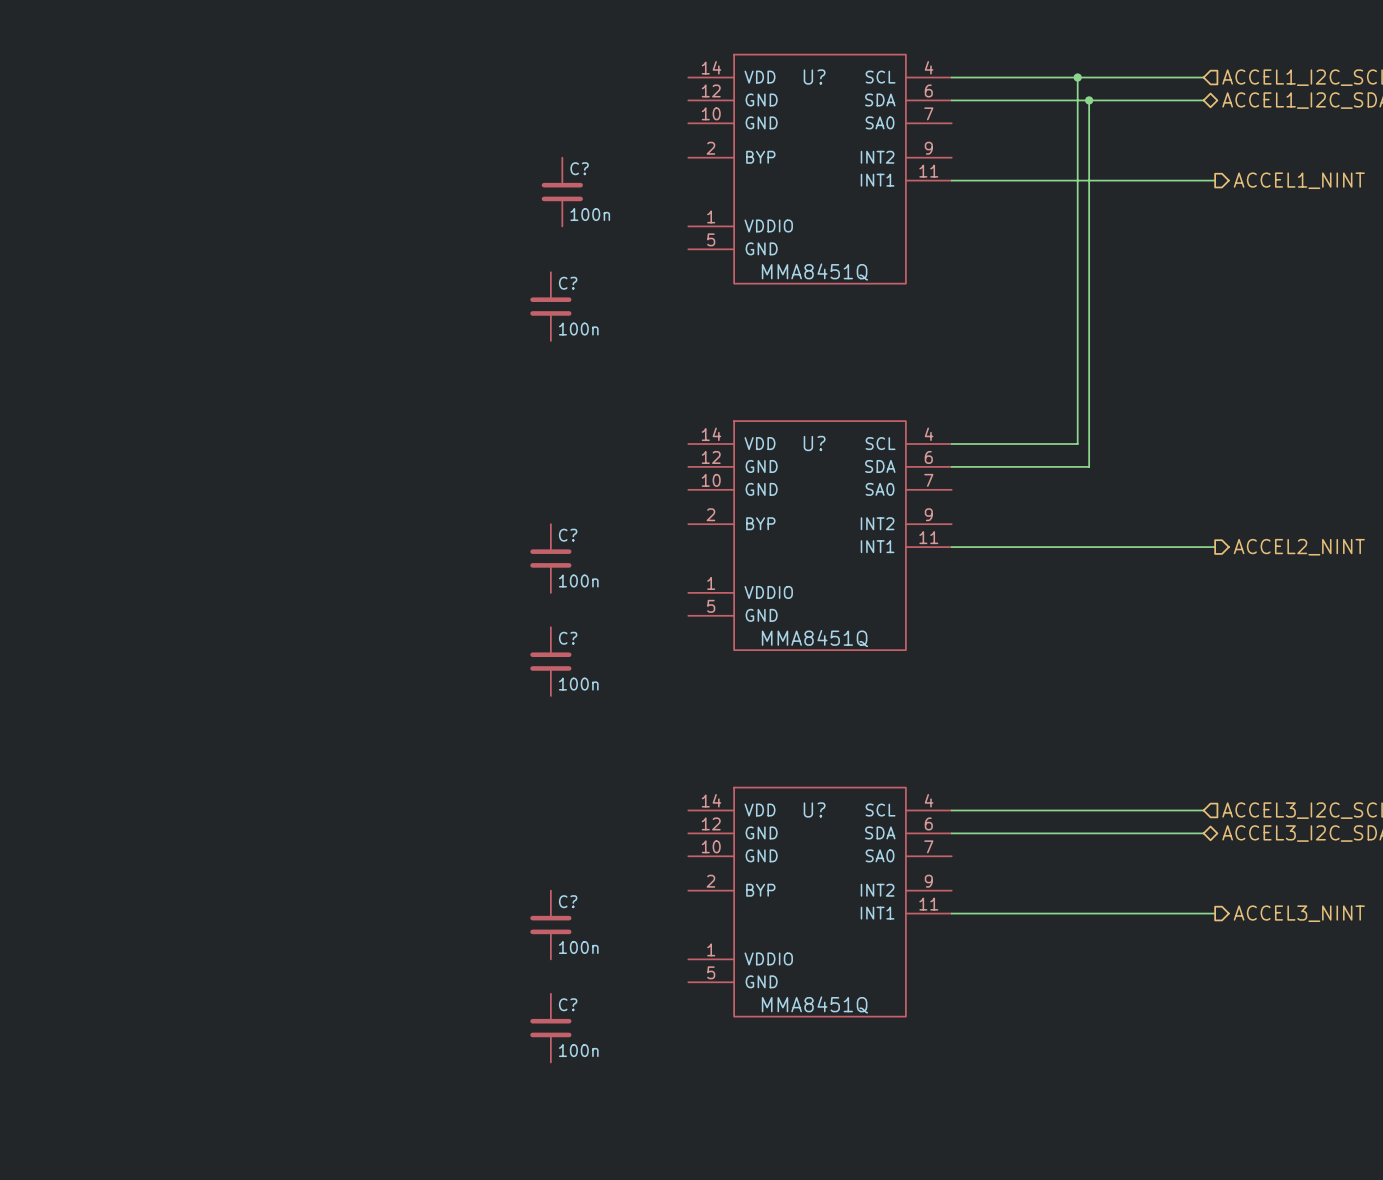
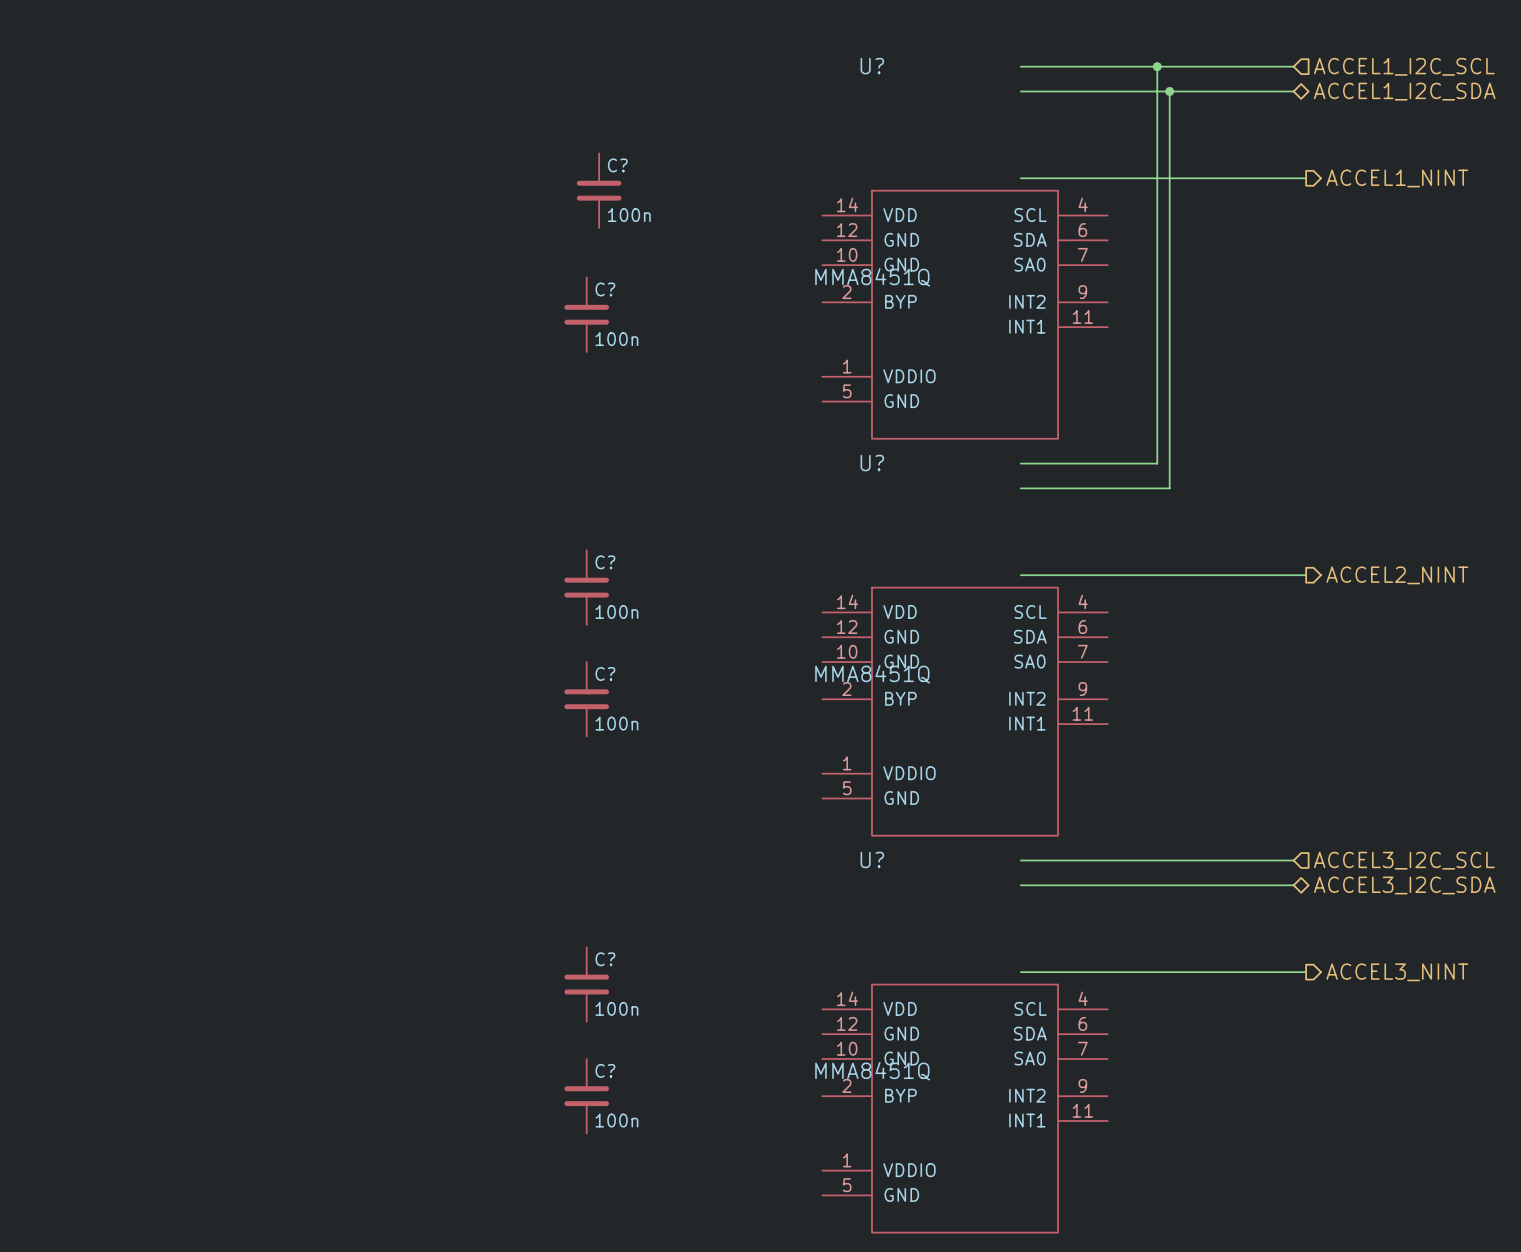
U?: MMA8451Q (820, 169) -> none
U?: none -> MMA8451Q (965, 314)
U?: MMA8451Q (820, 535) -> none
U?: none -> MMA8451Q (965, 711)
U?: MMA8451Q (820, 902) -> none
U?: none -> MMA8451Q (965, 1108)

